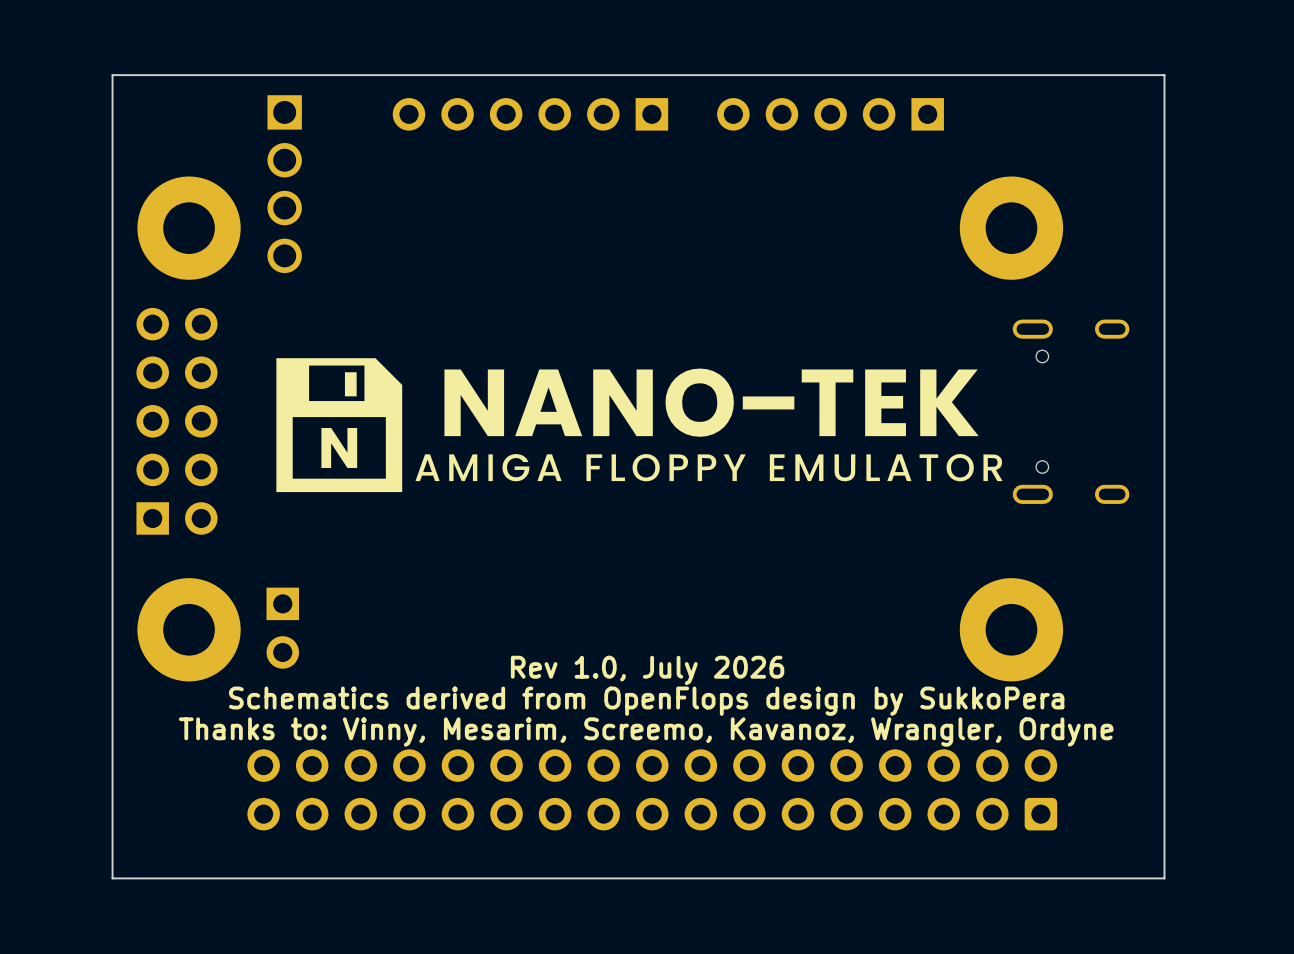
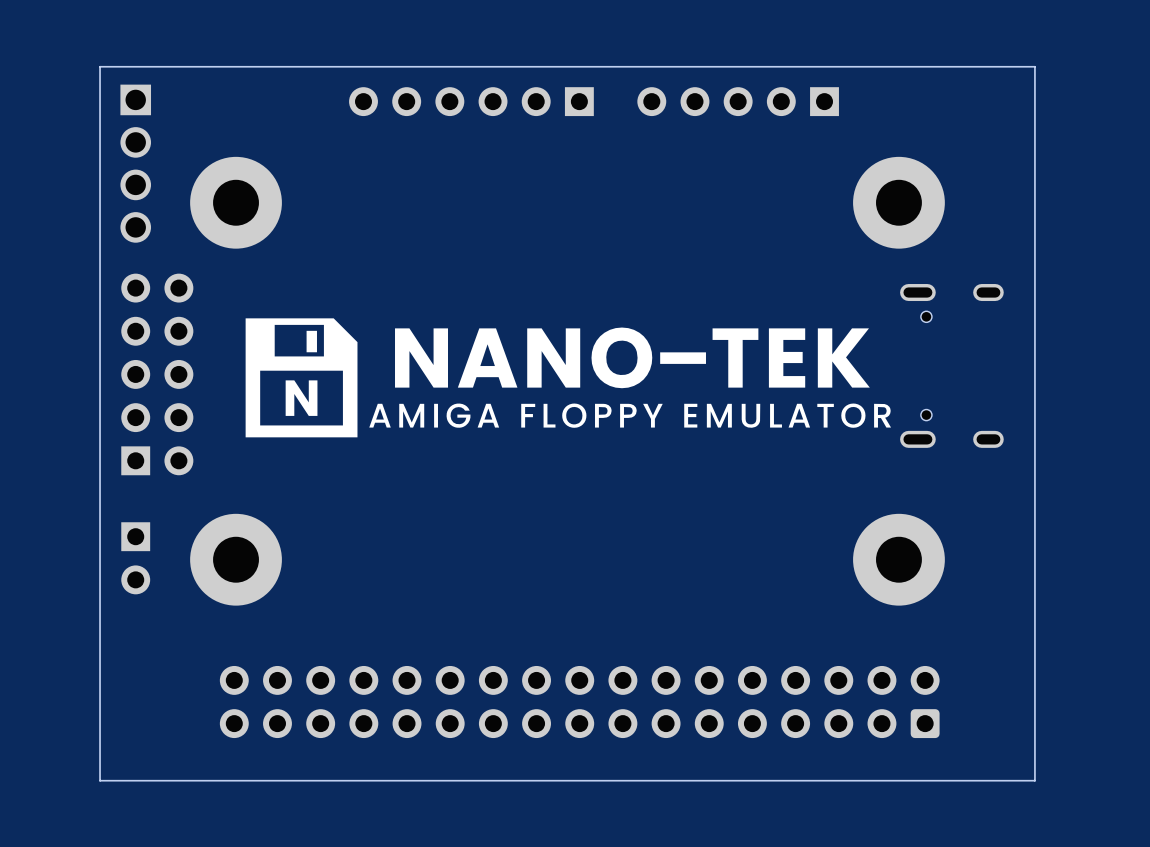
part position: (284, 184) -> (135, 163)
part position: (189, 228) -> (236, 202)
part footprint: [266, 587, 300, 669] -> [190, 513, 282, 606]
part: none -> (135, 558)
part: (189, 629) -> none
text: Rev 1.0, July 2026 (647, 670) -> none
text: Schematics derived from OpenFlops design by SukkoPera (646, 701) -> none
text: Thanks to: Vinny, Mesarim, Screemo, Kavanoz, Wrangler, Ordyne (646, 731) -> none

